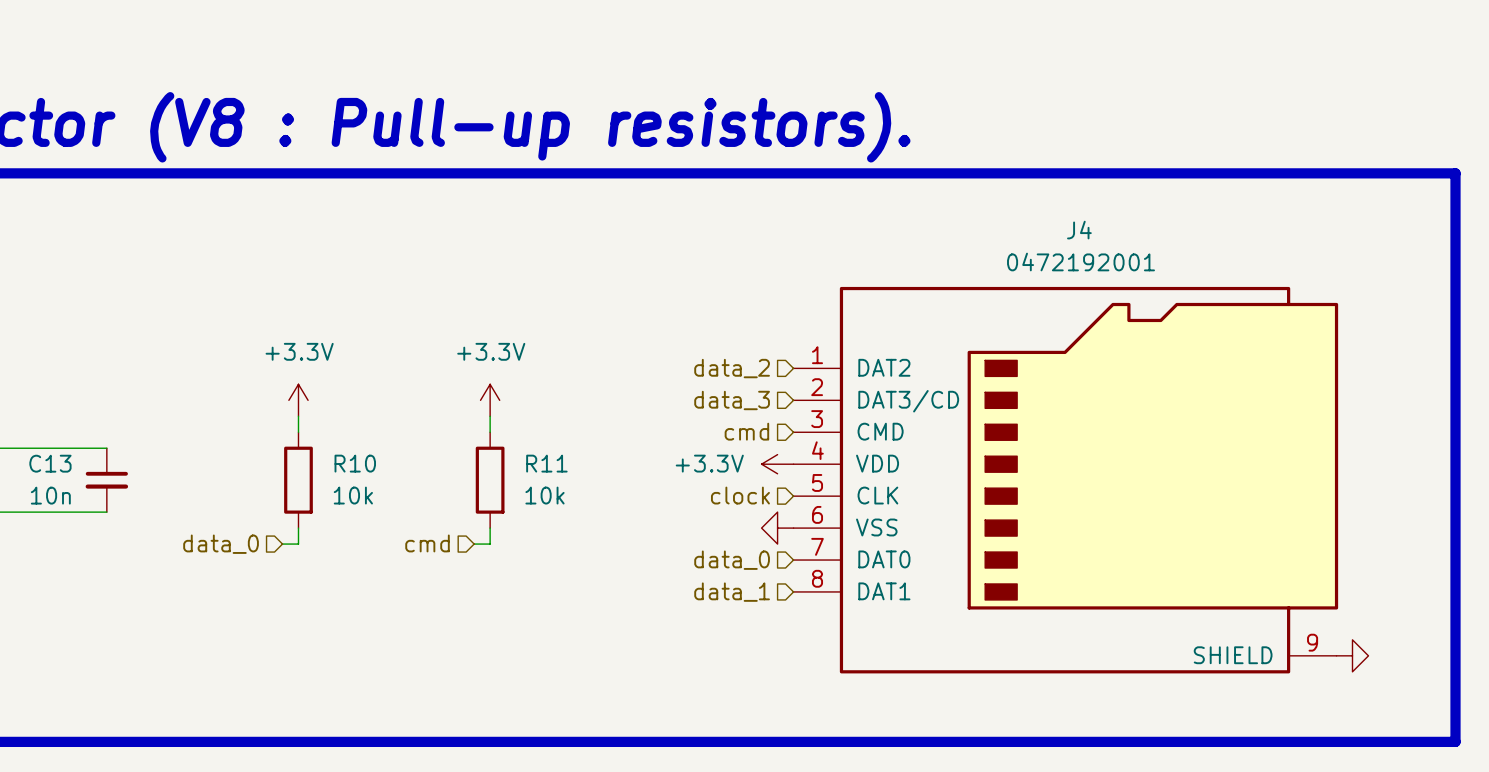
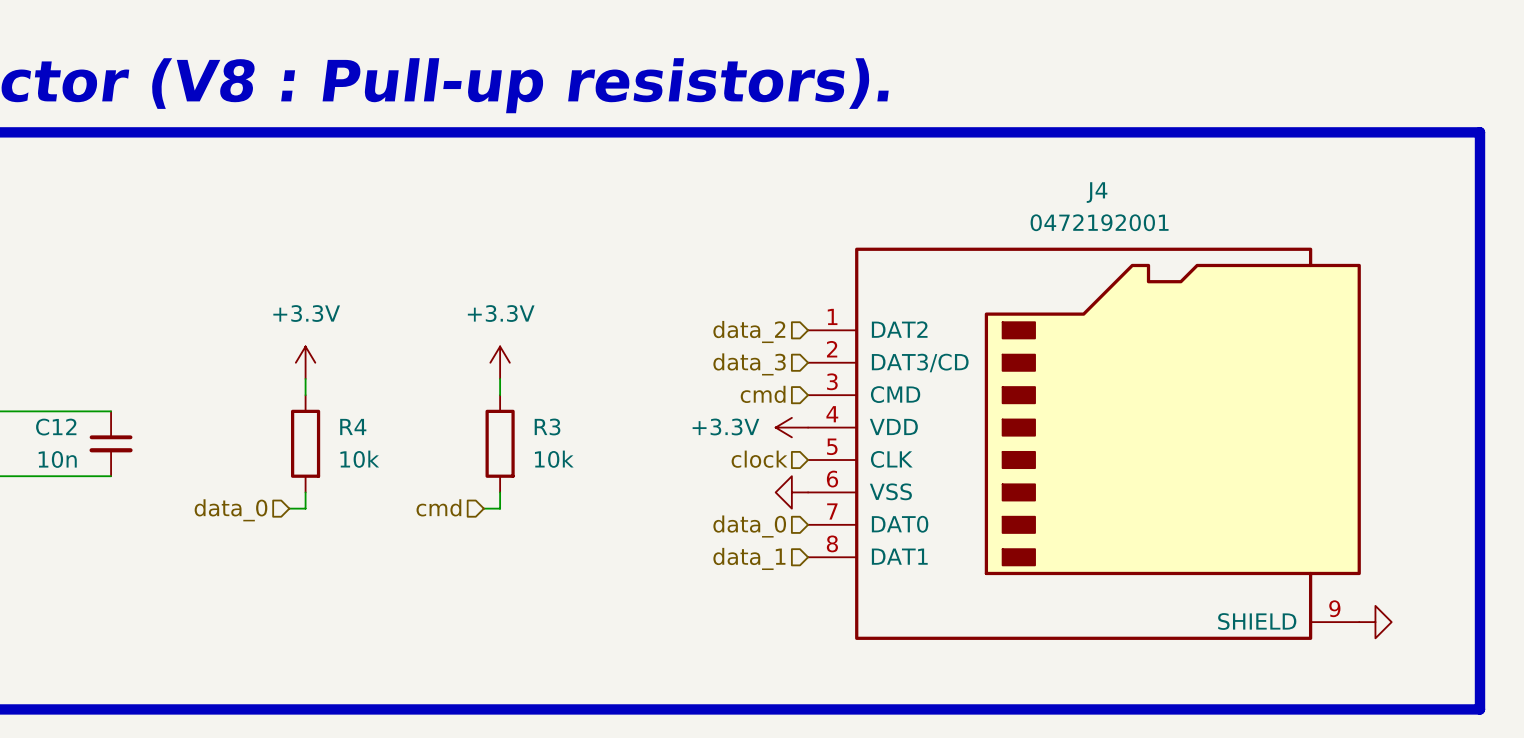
C13 name: C13 (50, 463) -> C12 (56, 427)
R10 name: R10 (355, 463) -> R4 (353, 426)
R11 name: R11 (546, 463) -> R3 (547, 426)

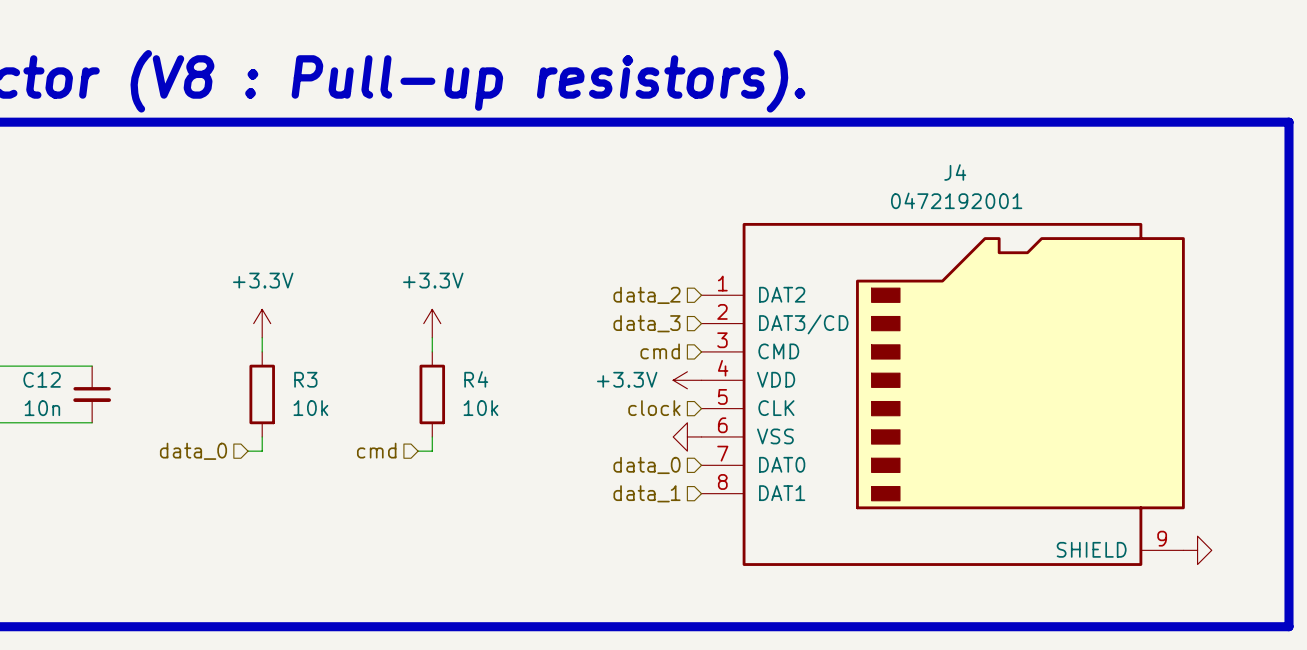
R4 name: R4 (353, 426) -> R3 (305, 379)
R3 name: R3 (547, 426) -> R4 (476, 379)

